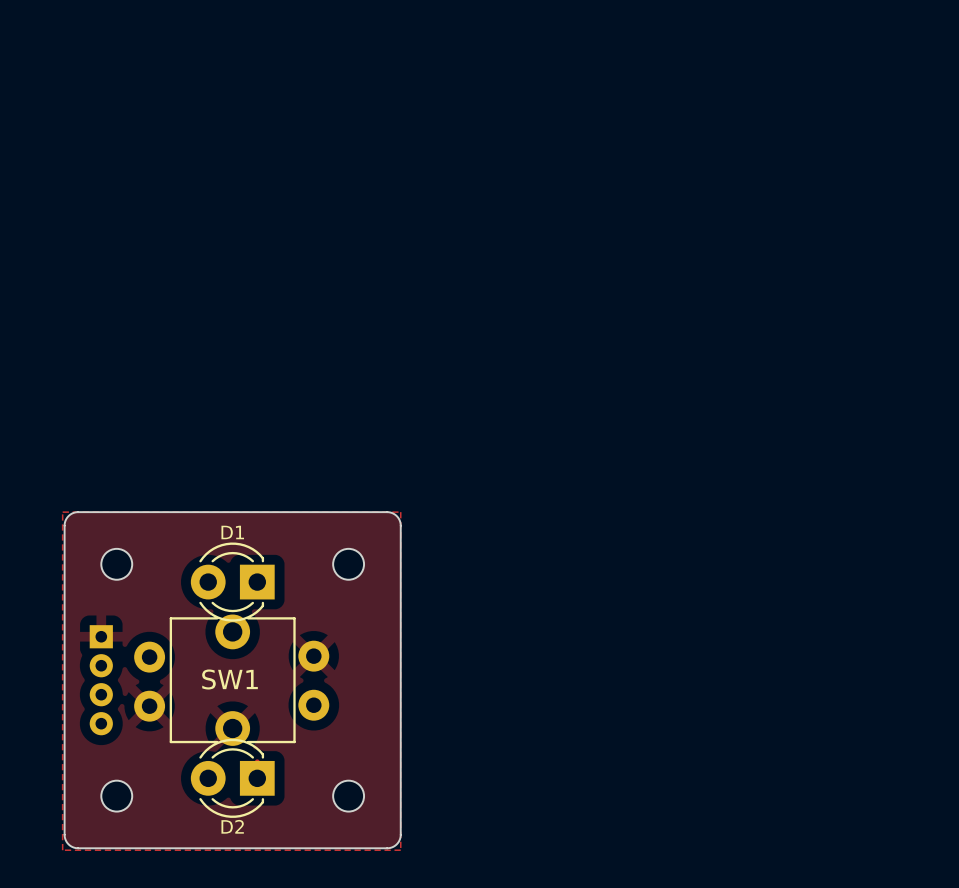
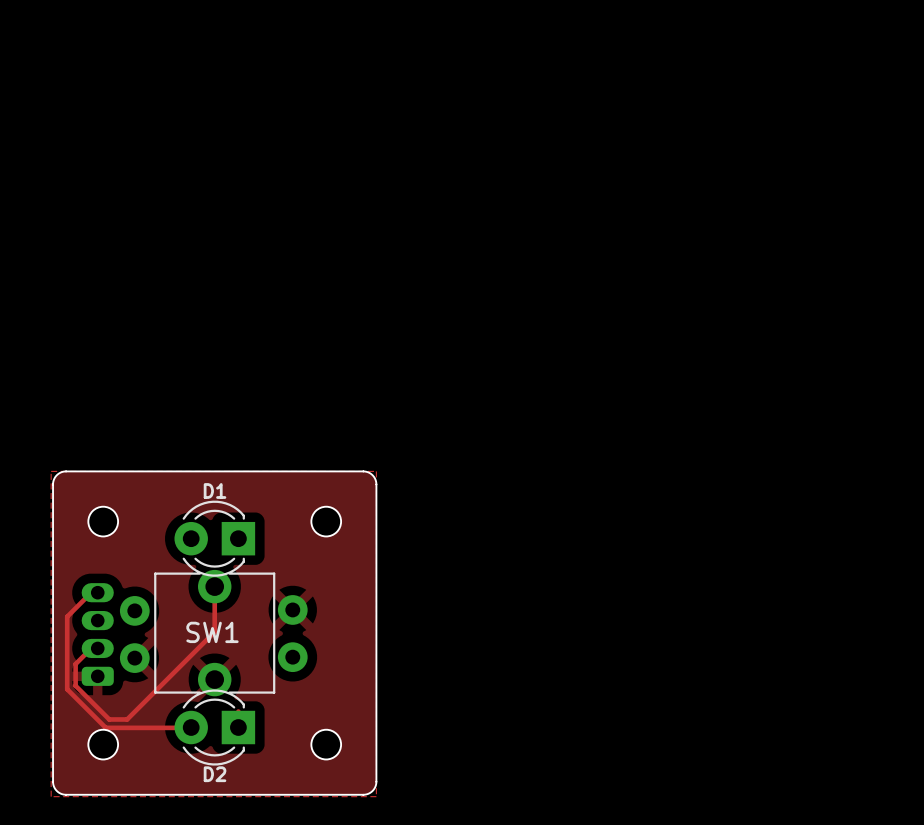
part footprint: [89, 625, 113, 736] -> [81, 583, 114, 686]
track: none -> (214, 586) (214, 631) (127, 719) (109, 719) (75, 685) (75, 664) (91, 648) (97, 648)
track: none -> (97, 592) (91, 592) (67, 616) (67, 689) (105, 727) (191, 727)

